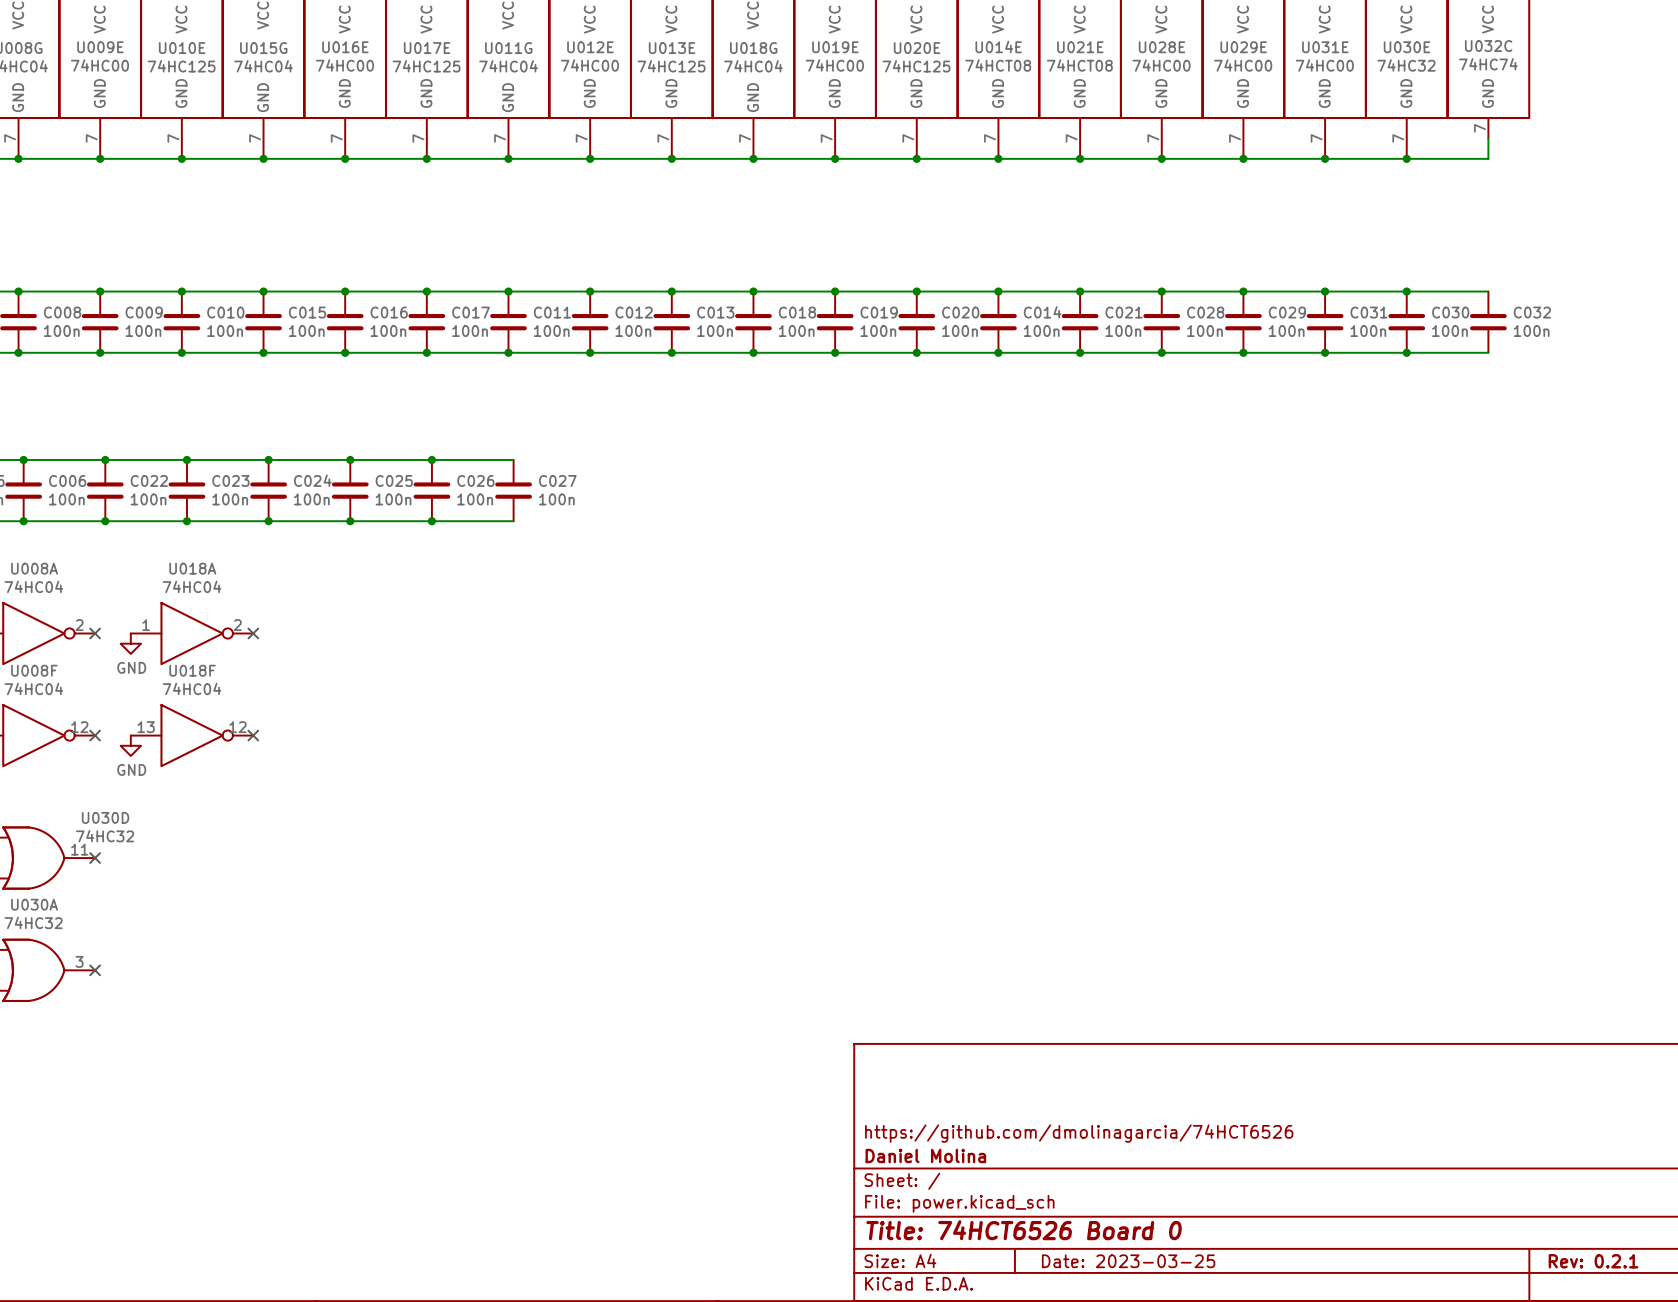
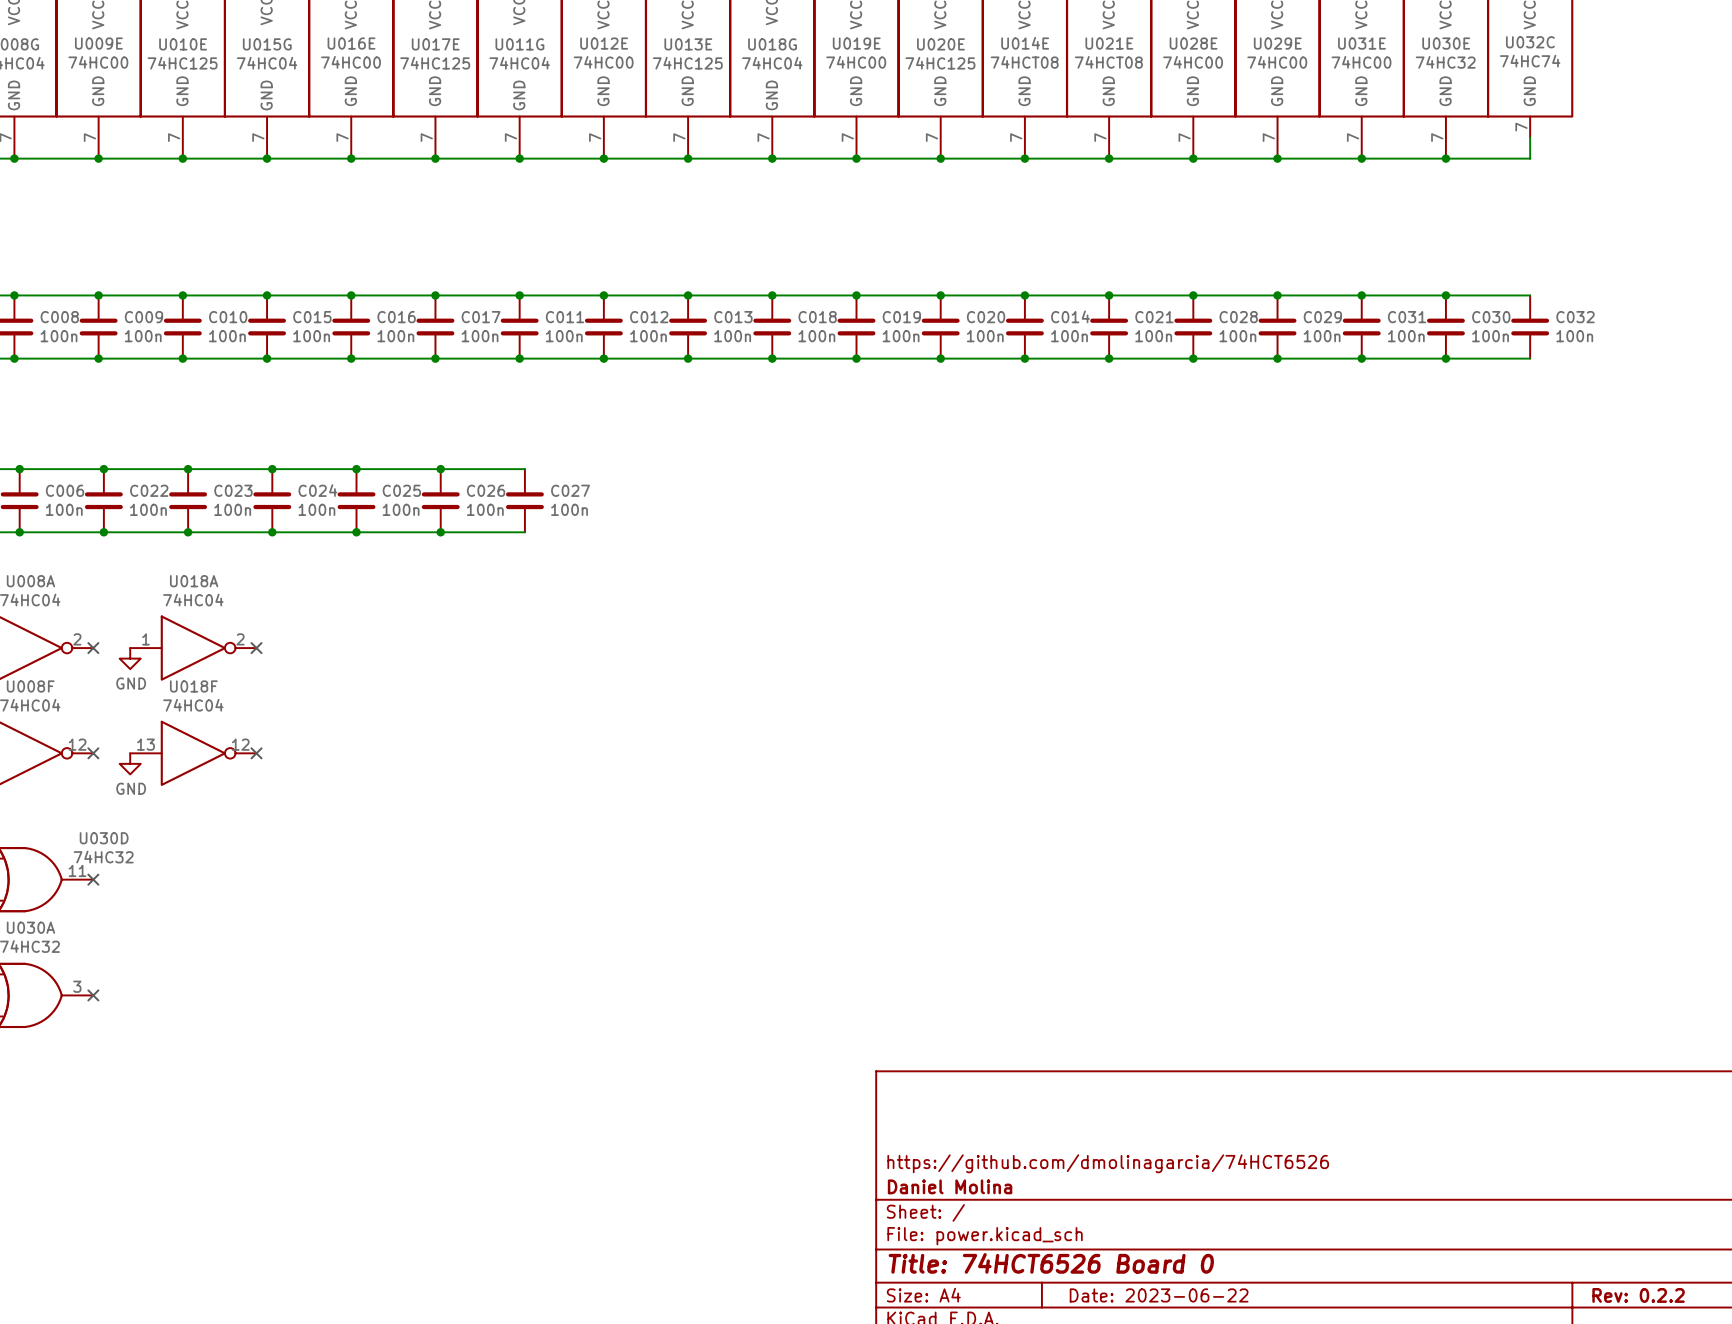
title block: Date: 2023-03-25 (1128, 1261) -> Date: 2023-06-22 (1159, 1295)
title block: Rev: 0.2.1 (1593, 1261) -> Rev: 0.2.2 (1638, 1295)

